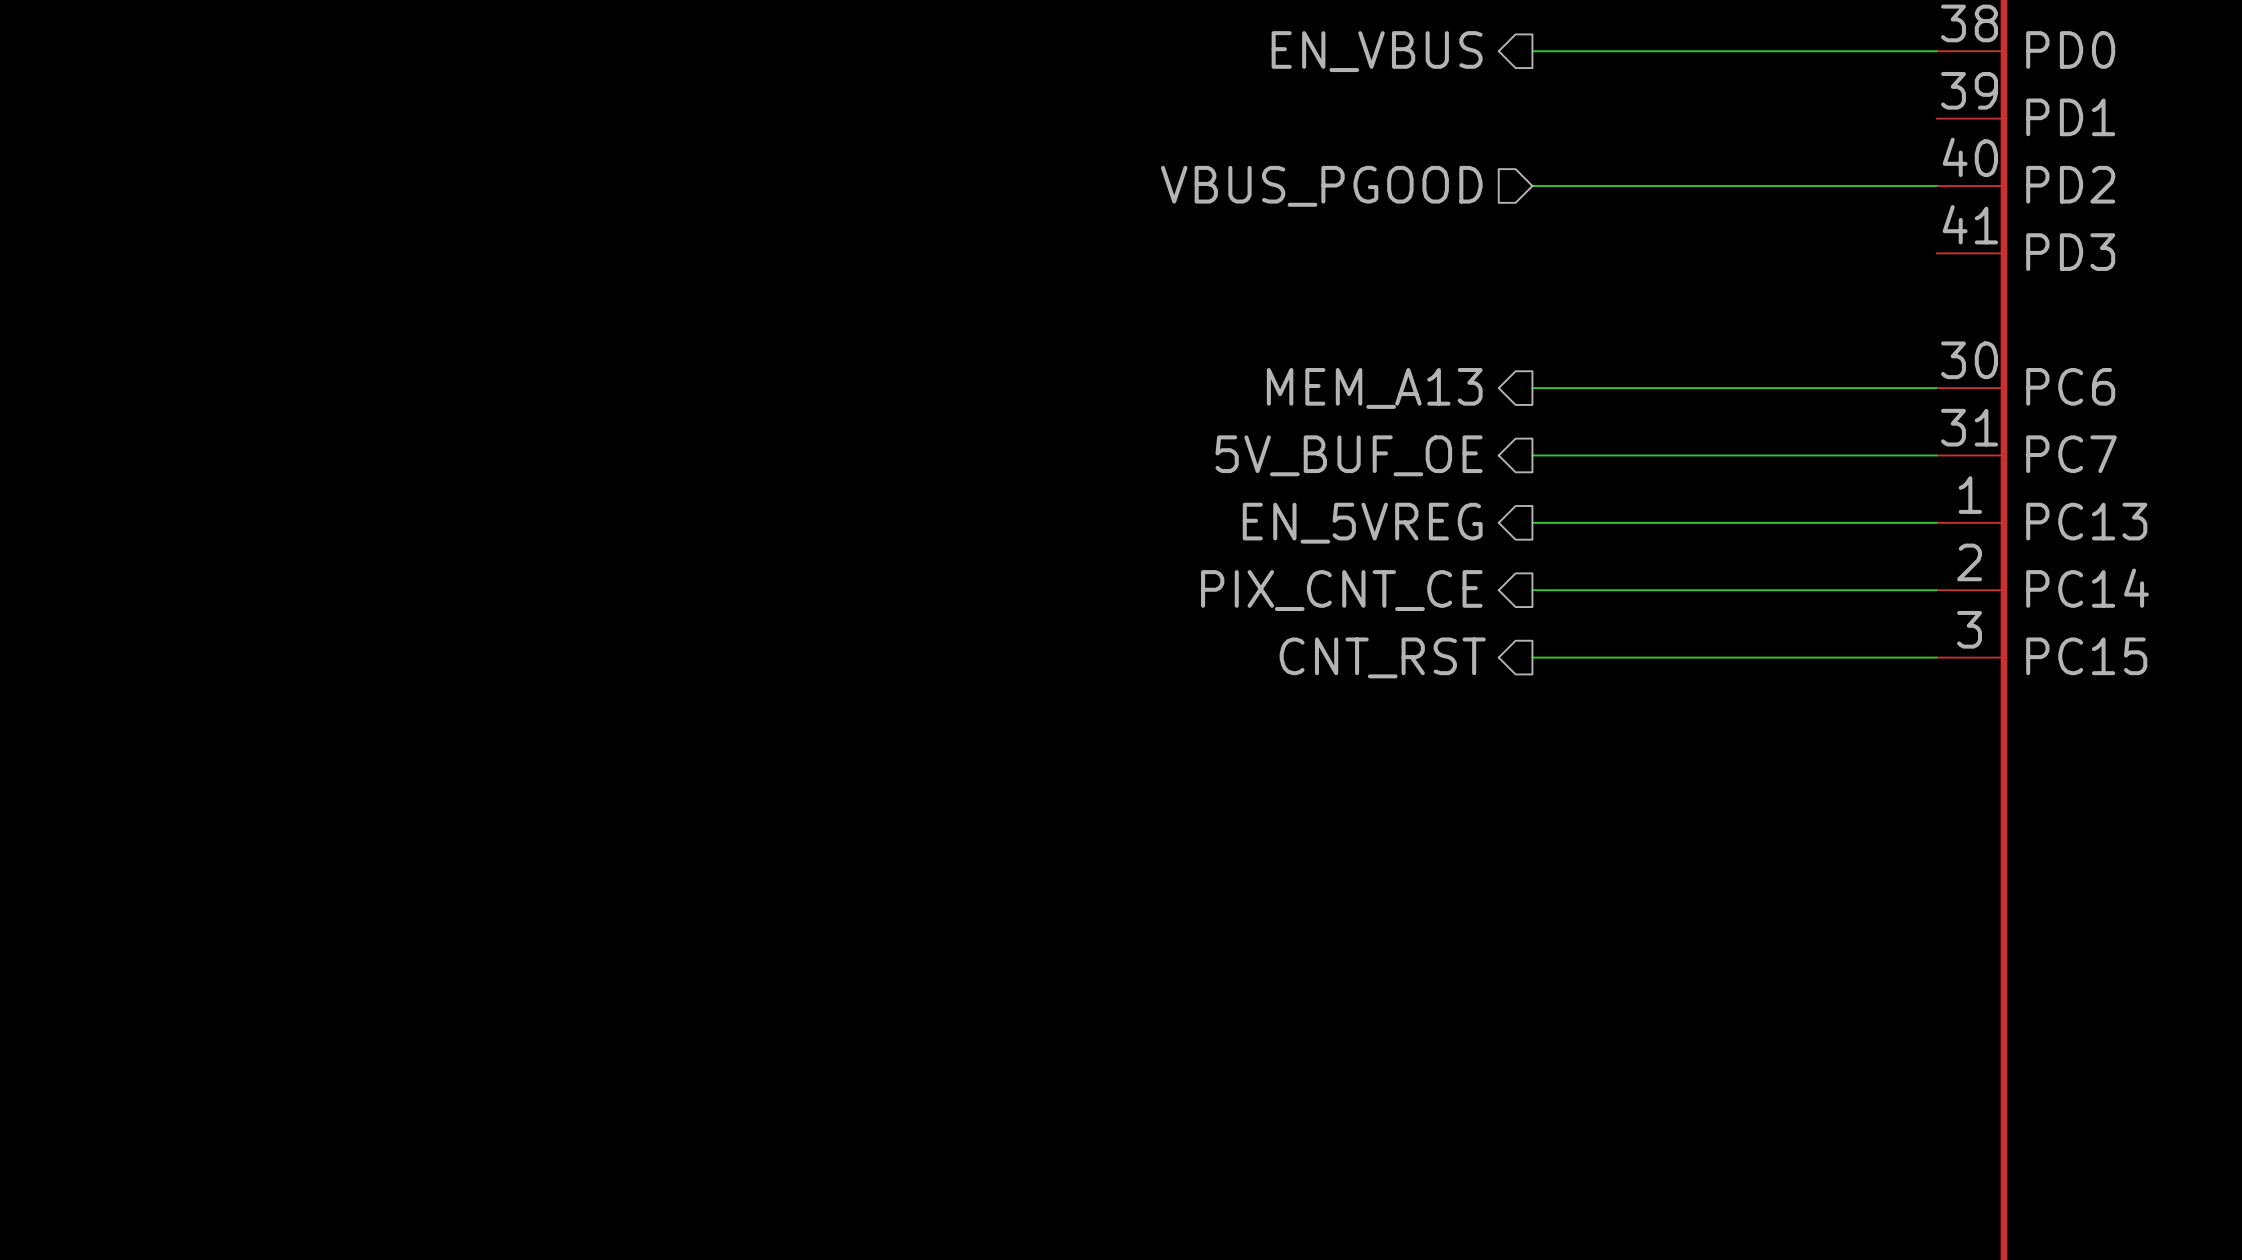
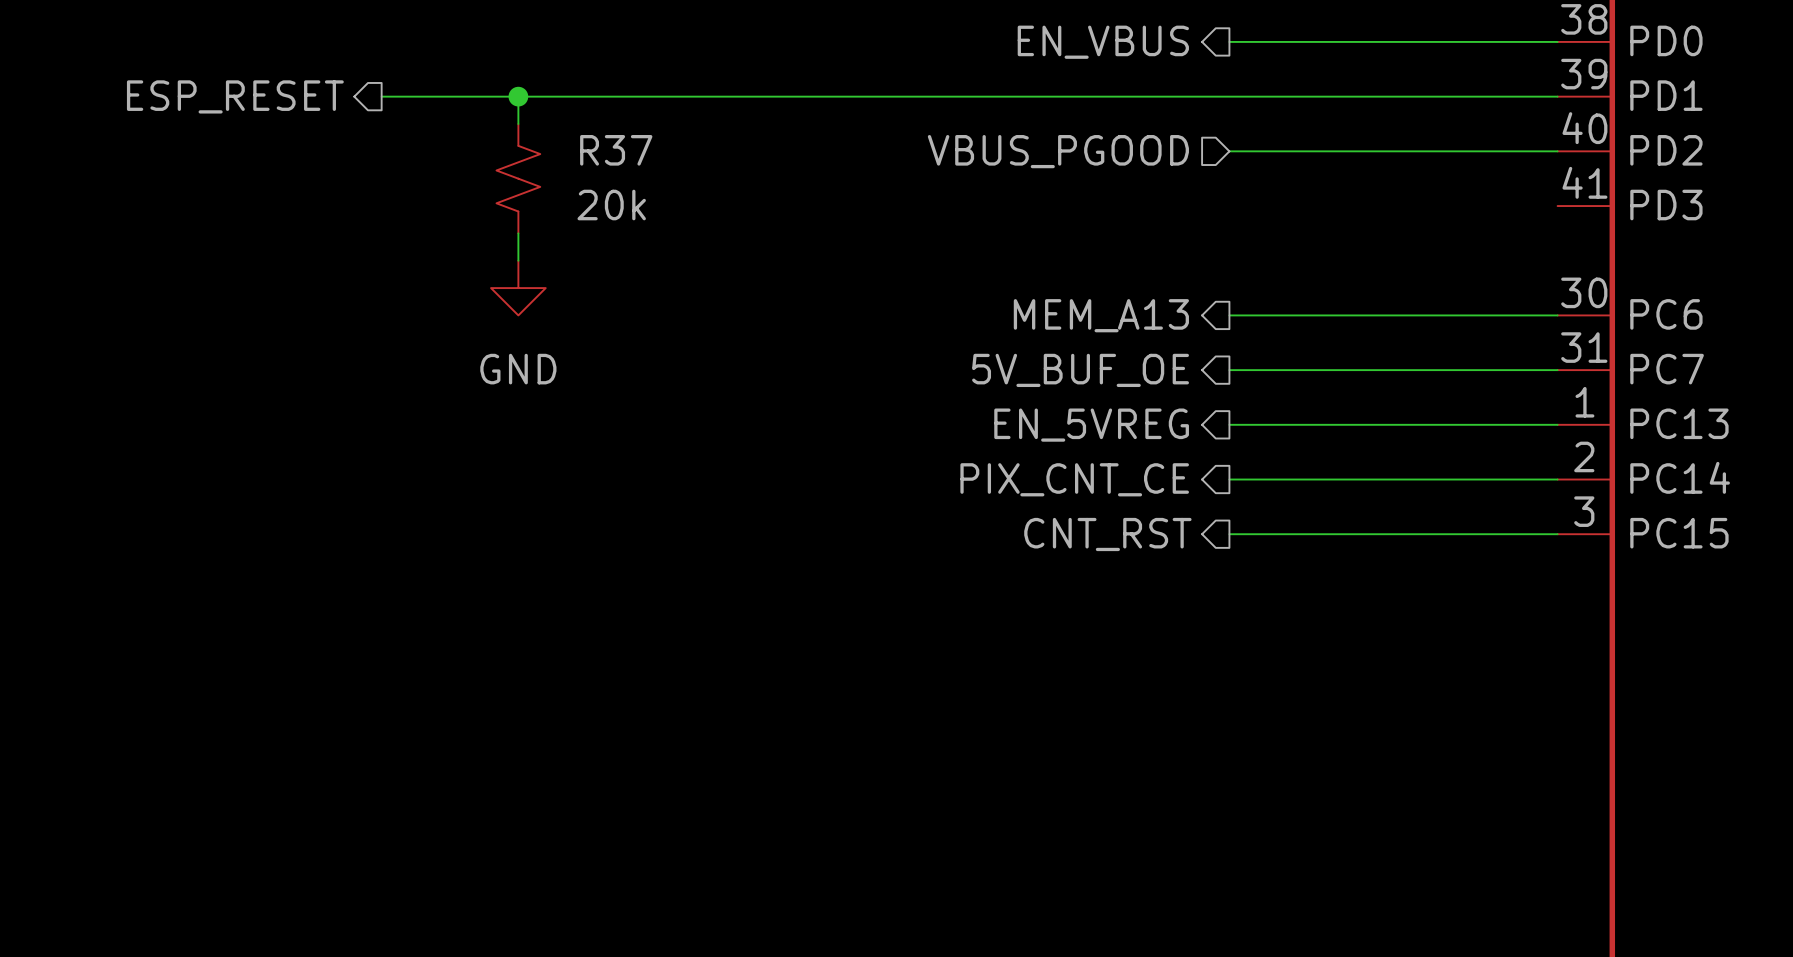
hierarchical label: none -> ESP_RESET (235, 96)
wire: none -> (381, 96) (1557, 96)
wire: none -> (518, 96) (518, 123)
junction: none -> (518, 96)
R37: none -> 20k (518, 178)
wire: none -> (518, 233) (518, 260)
power symbol: none -> GND (518, 288)

